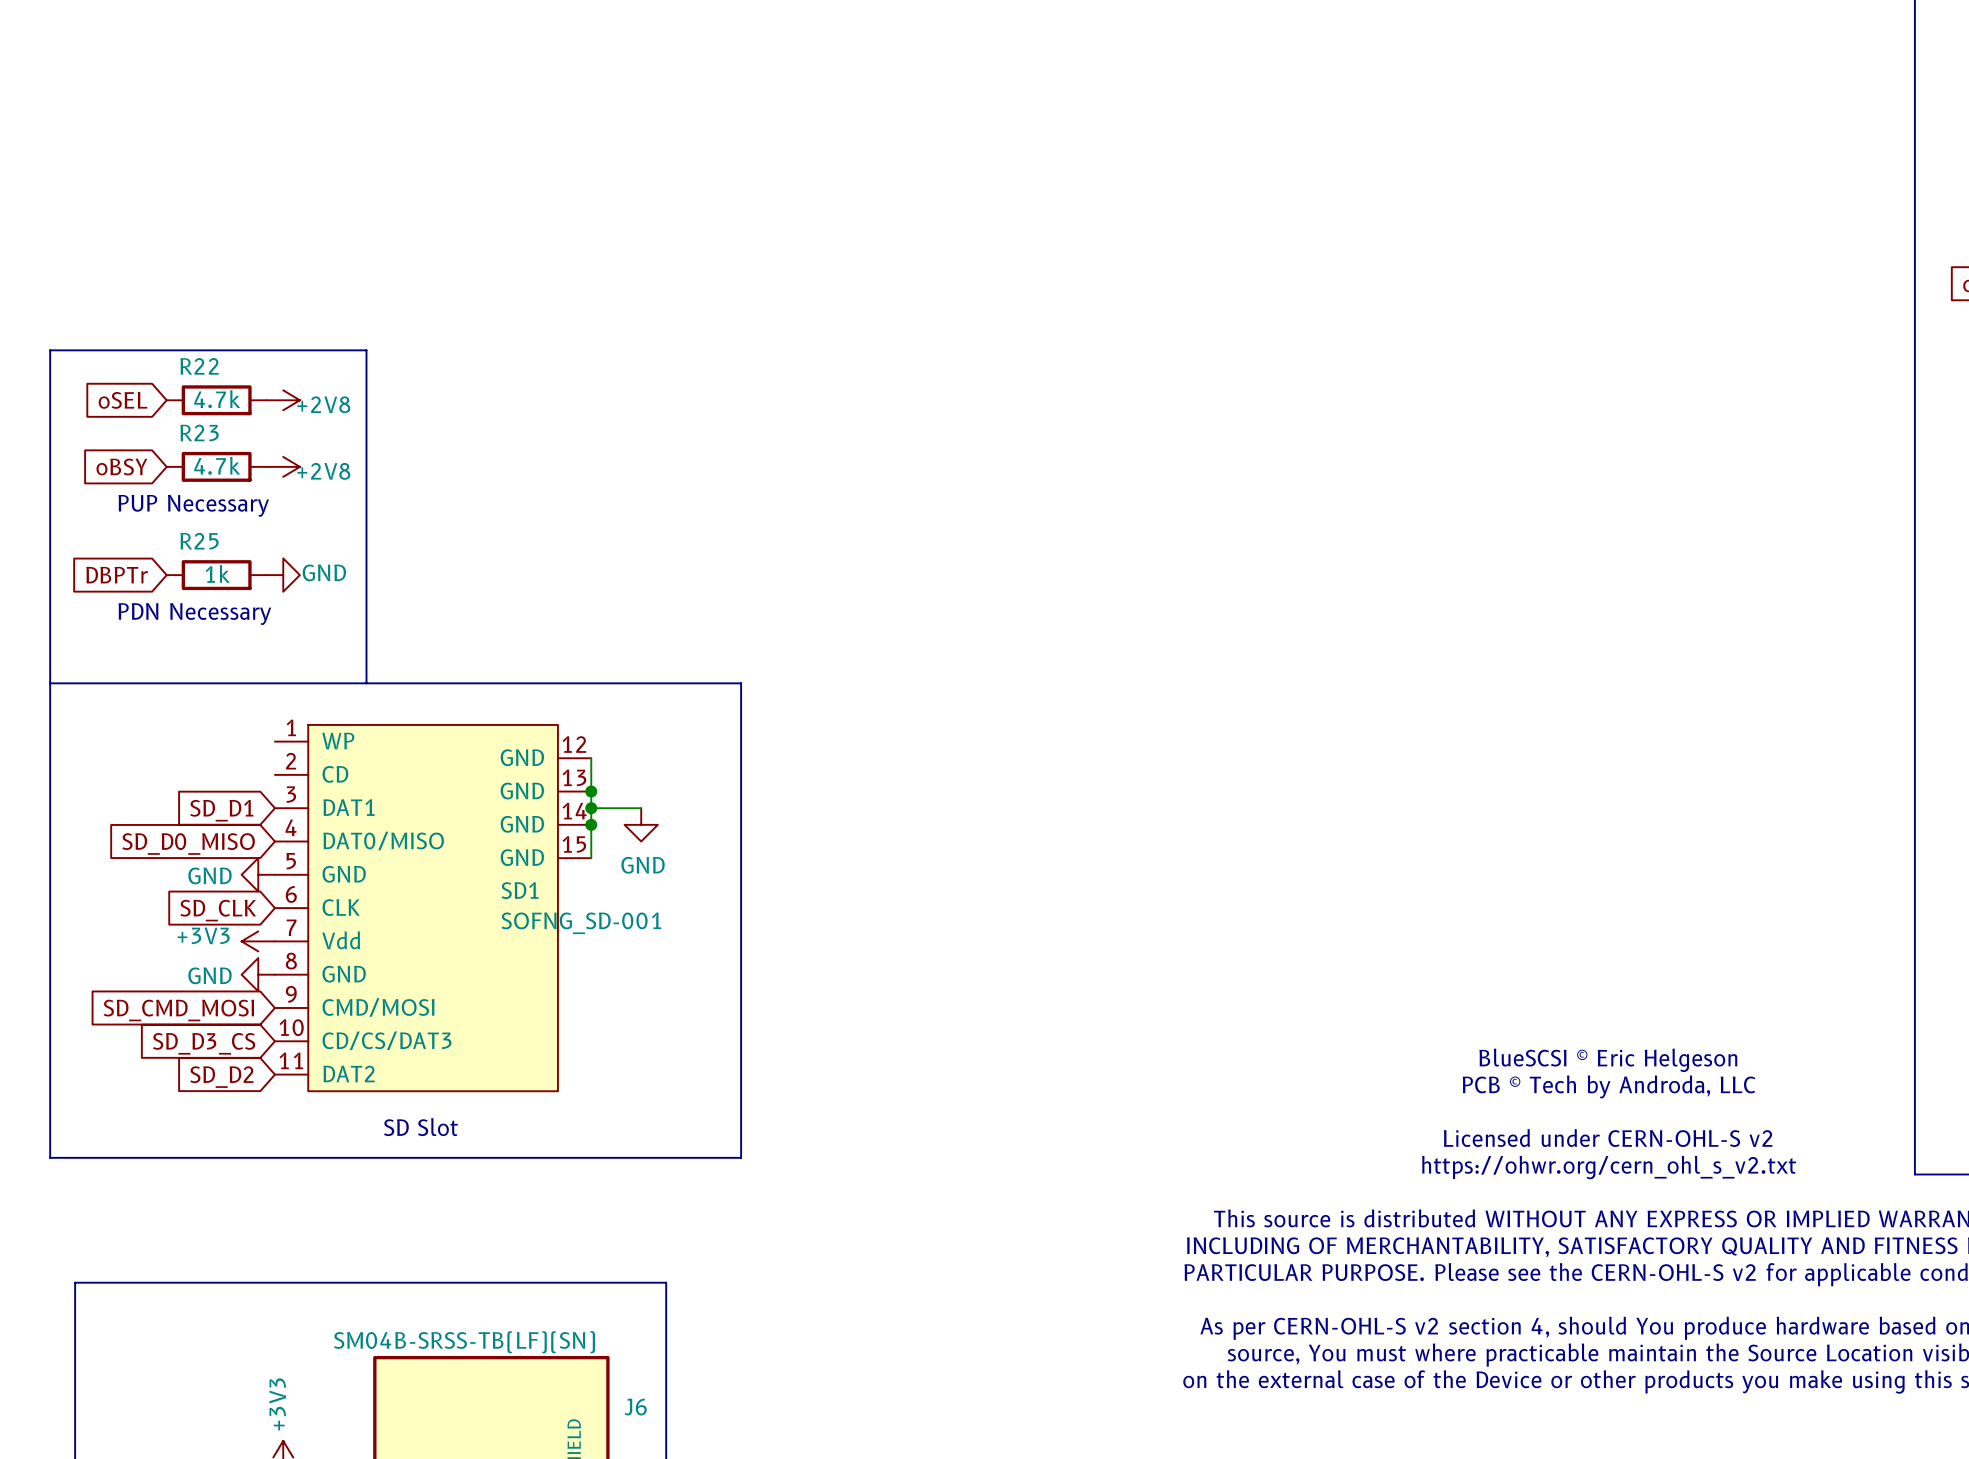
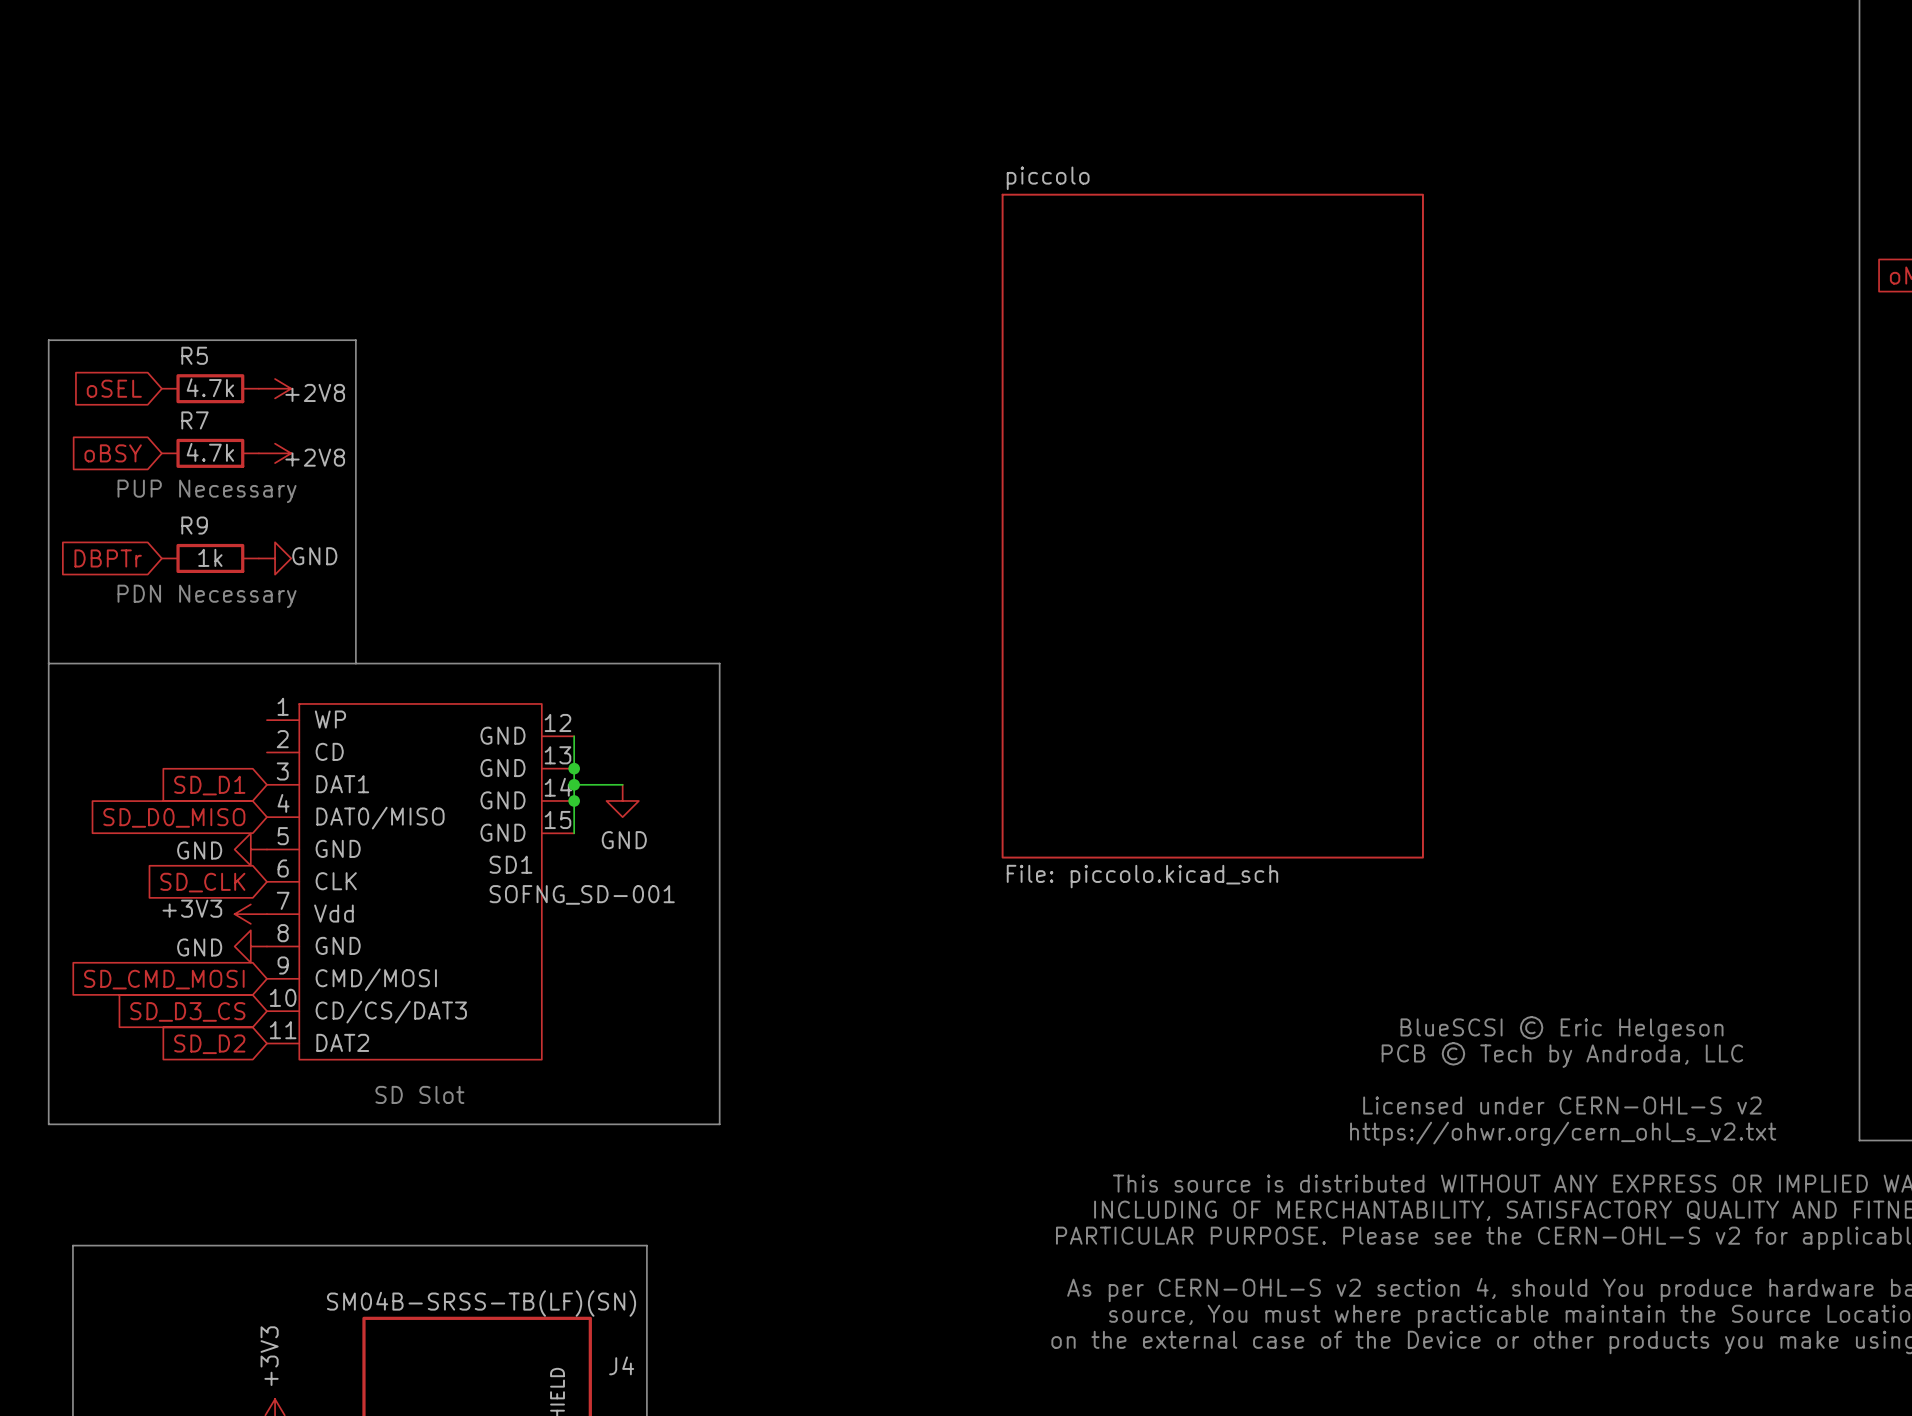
R22 name: R22 (199, 366) -> R5 (194, 355)
R23 name: R23 (199, 432) -> R7 (194, 420)
R25 name: R25 (199, 541) -> R9 (194, 525)
sheet piccolo: none -> File: piccolo.kicad_sch (1212, 526)
J6 name: J6 (635, 1407) -> J4 (621, 1365)

